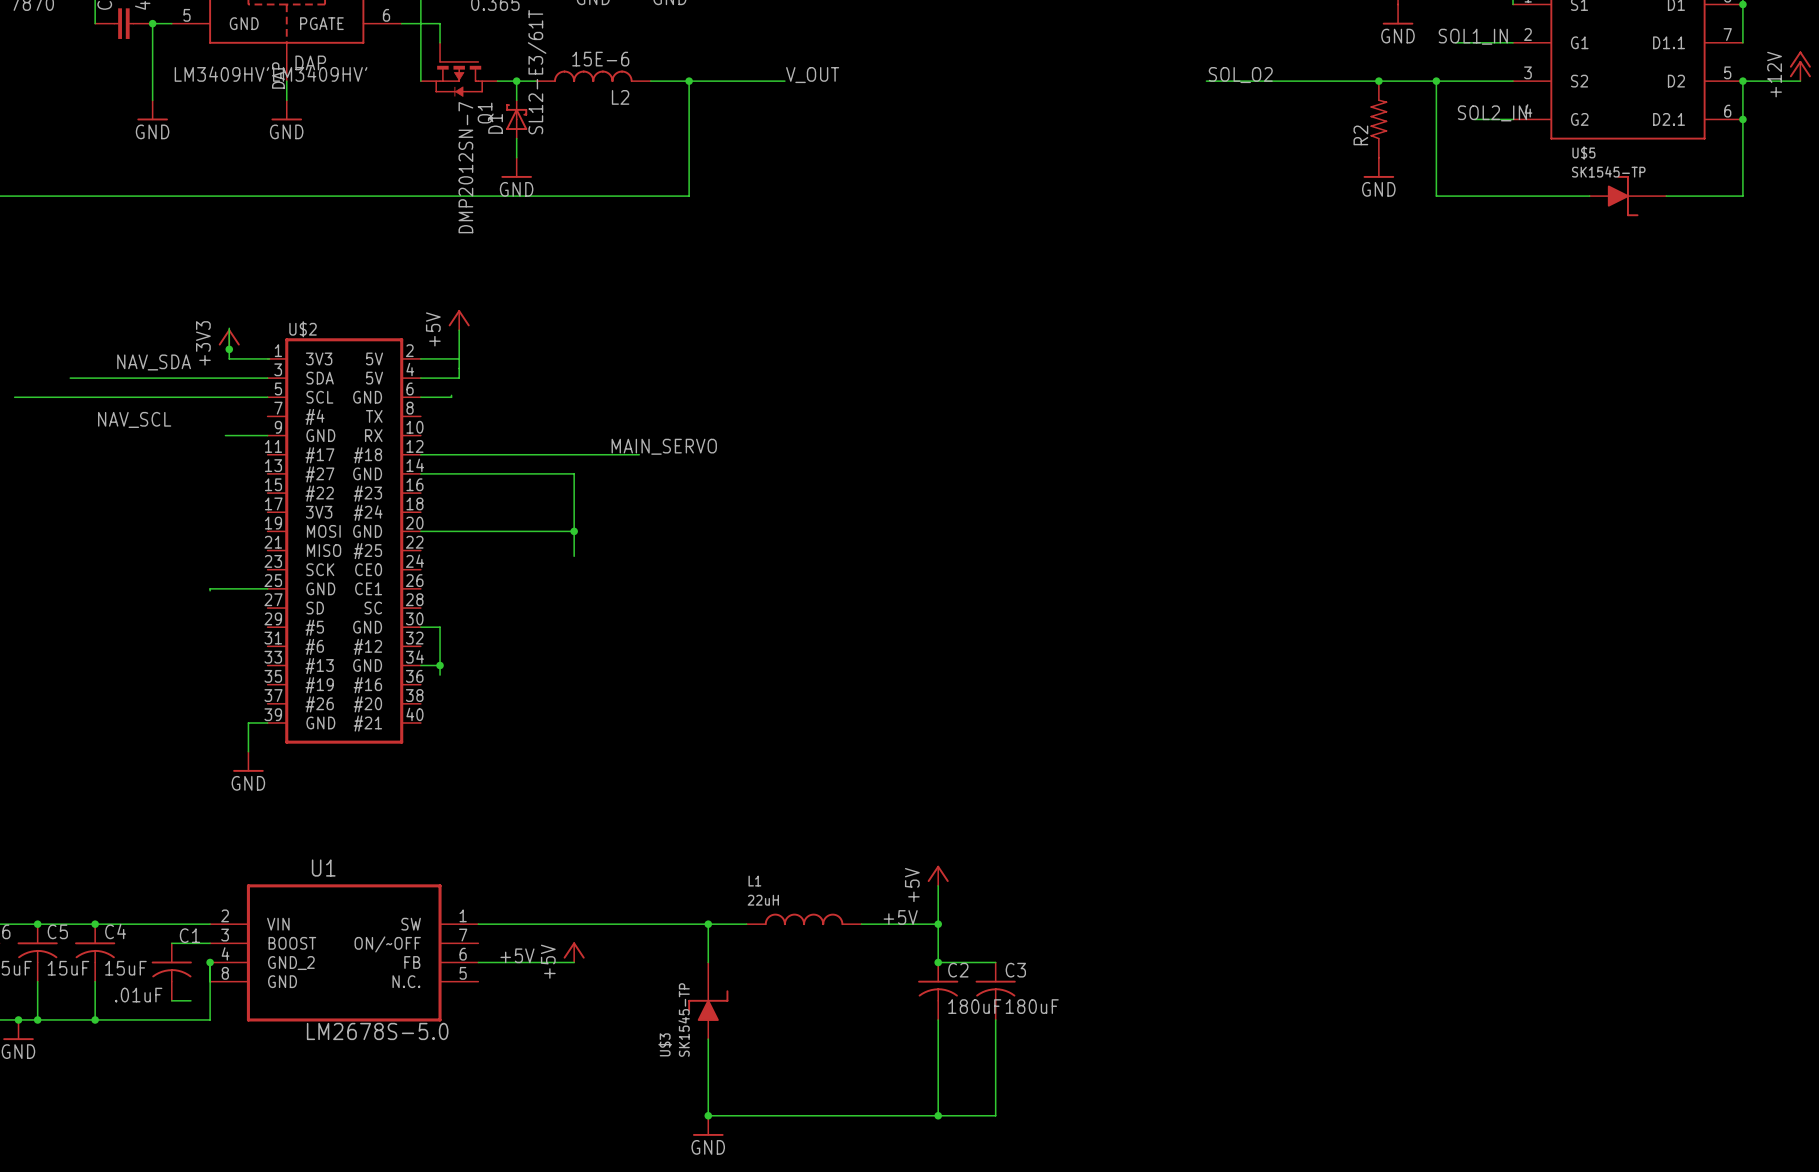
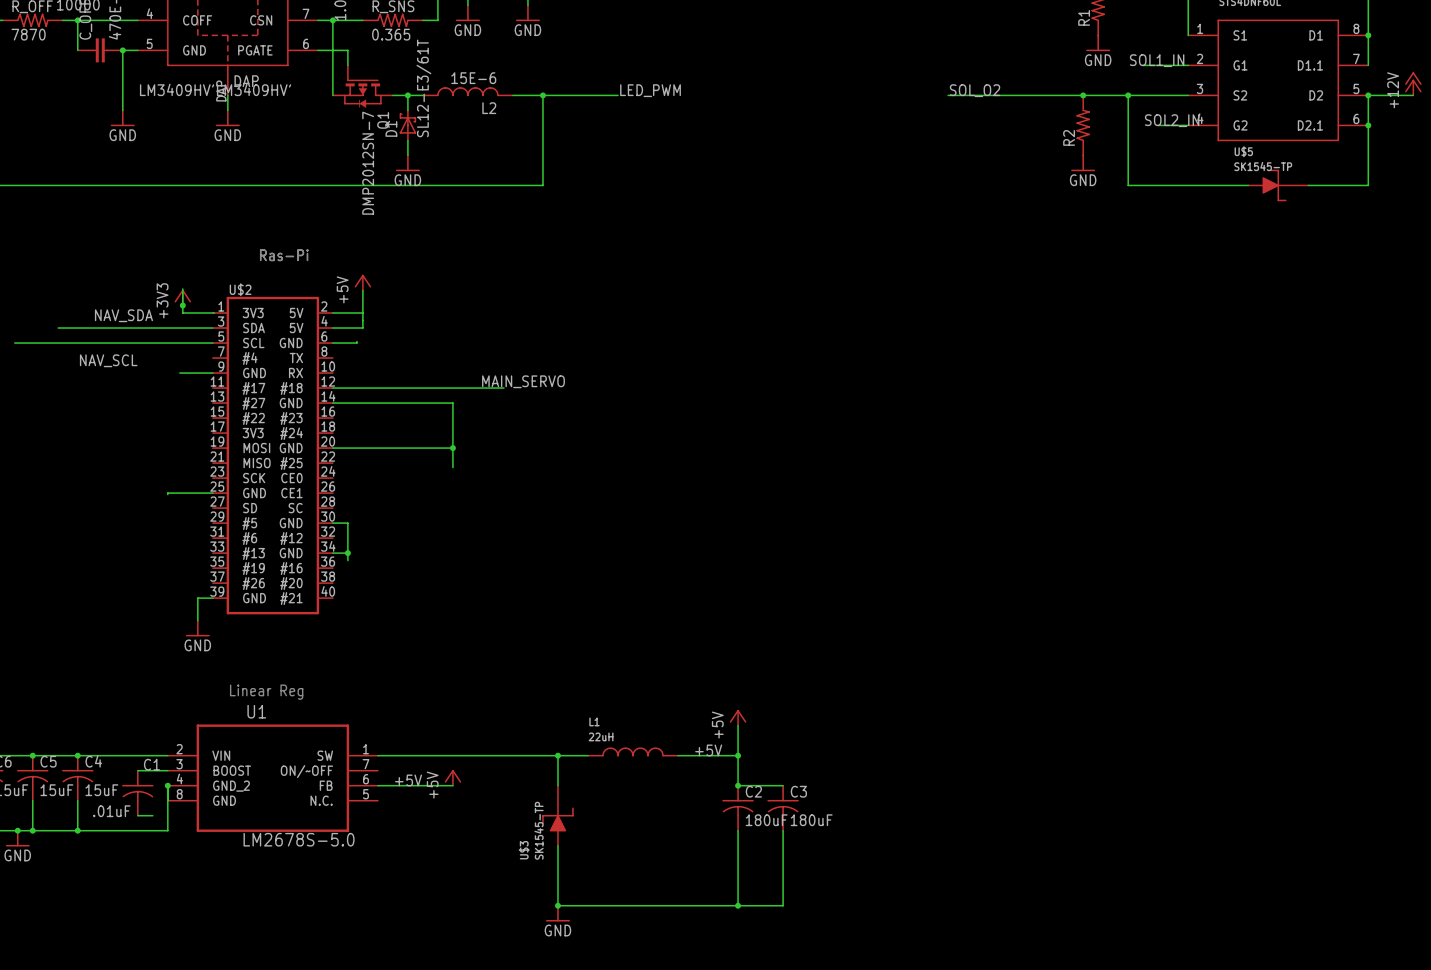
label: V_OUT (812, 75) -> LED_PWM (650, 90)
text: none -> Ras-Pi (284, 255)
text: none -> Linear Reg (266, 692)

